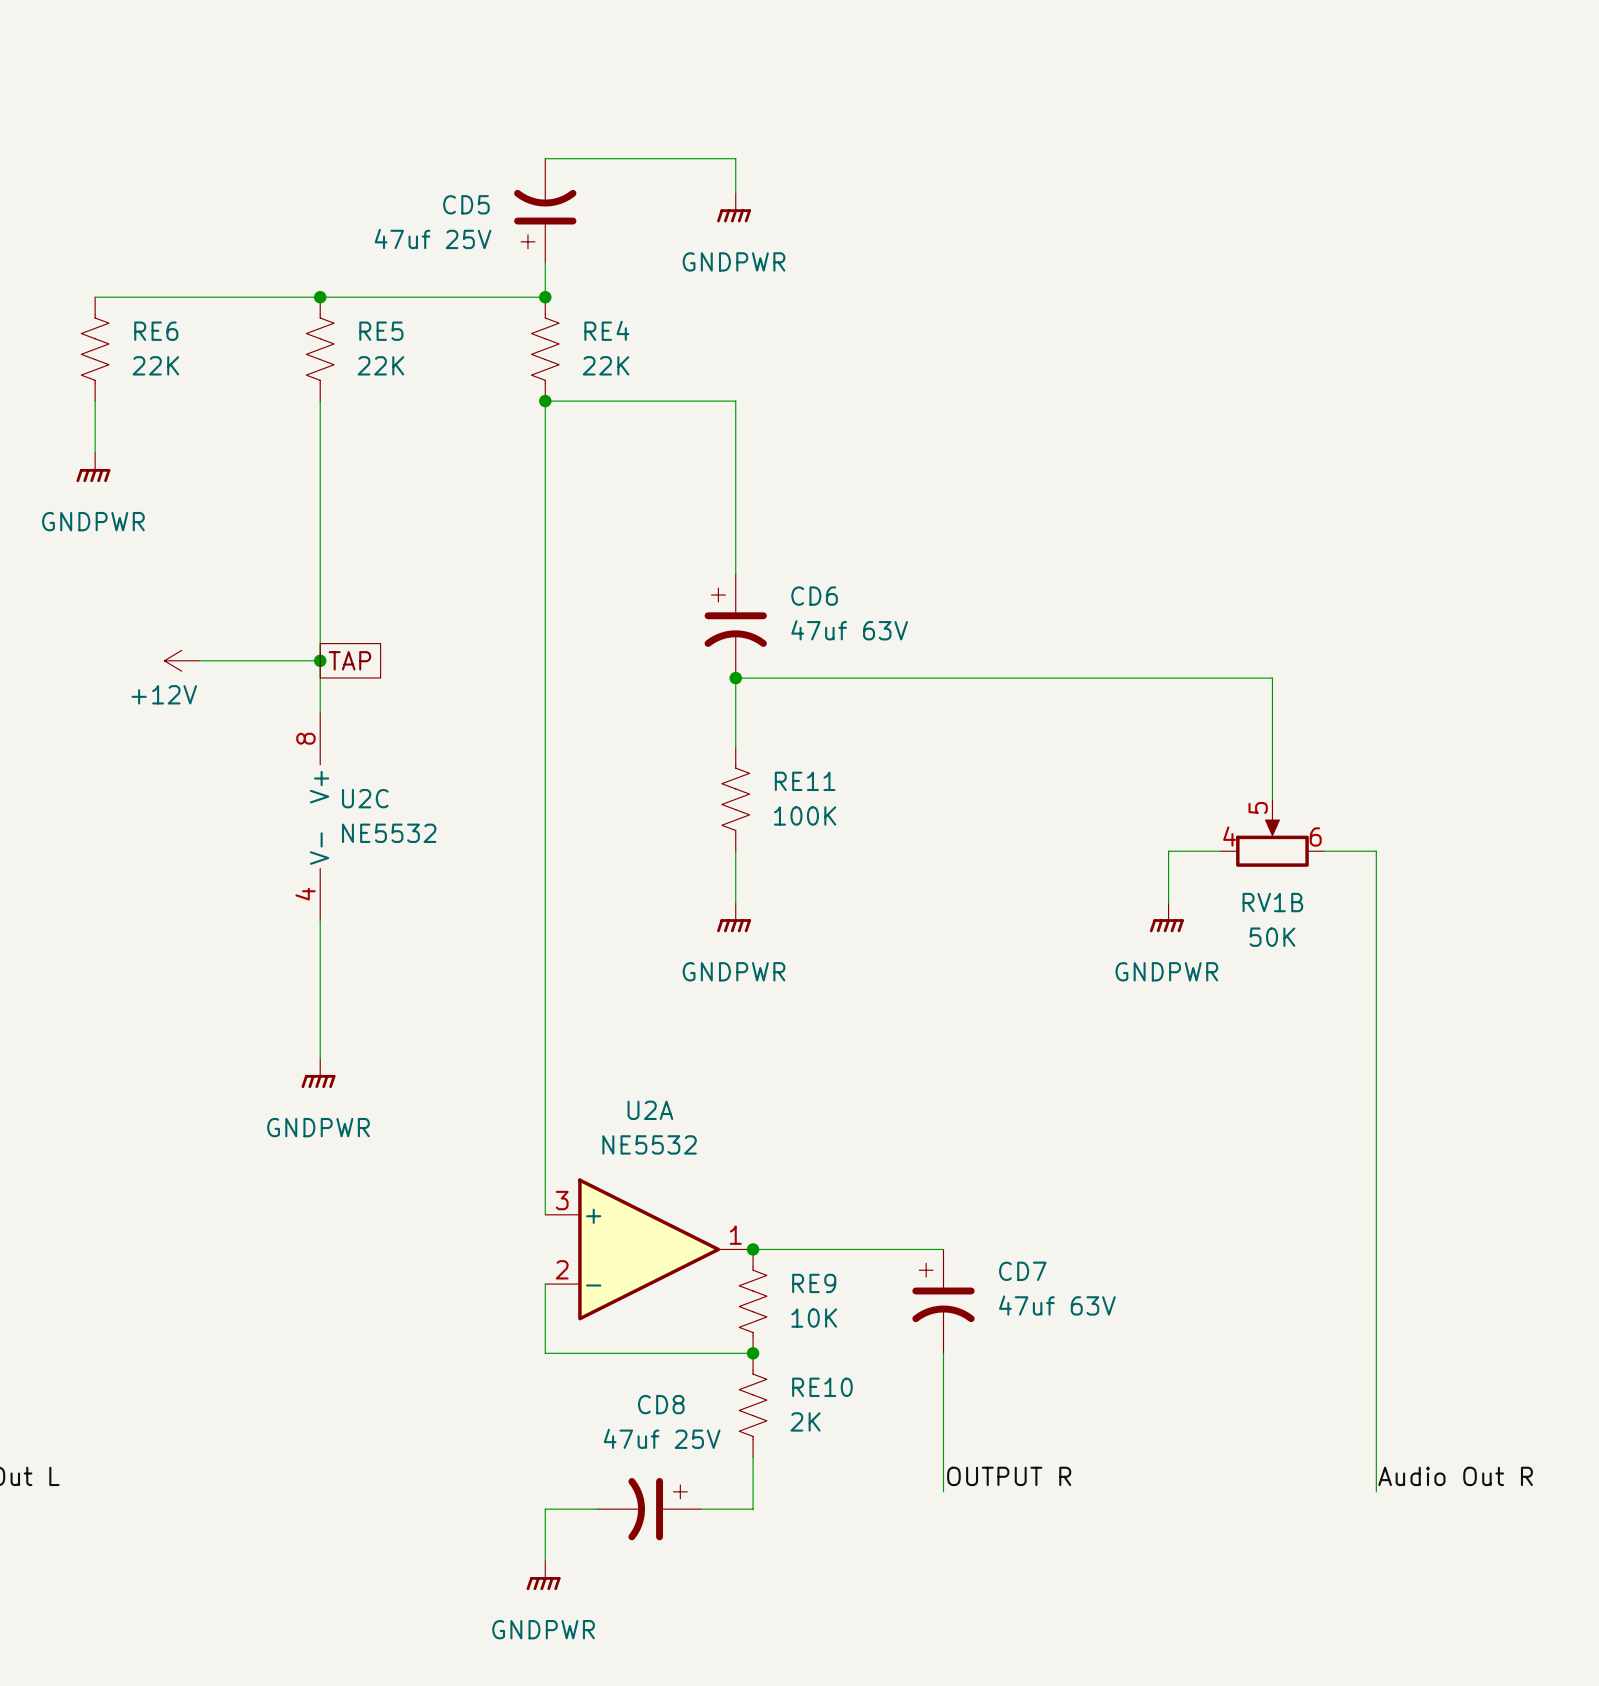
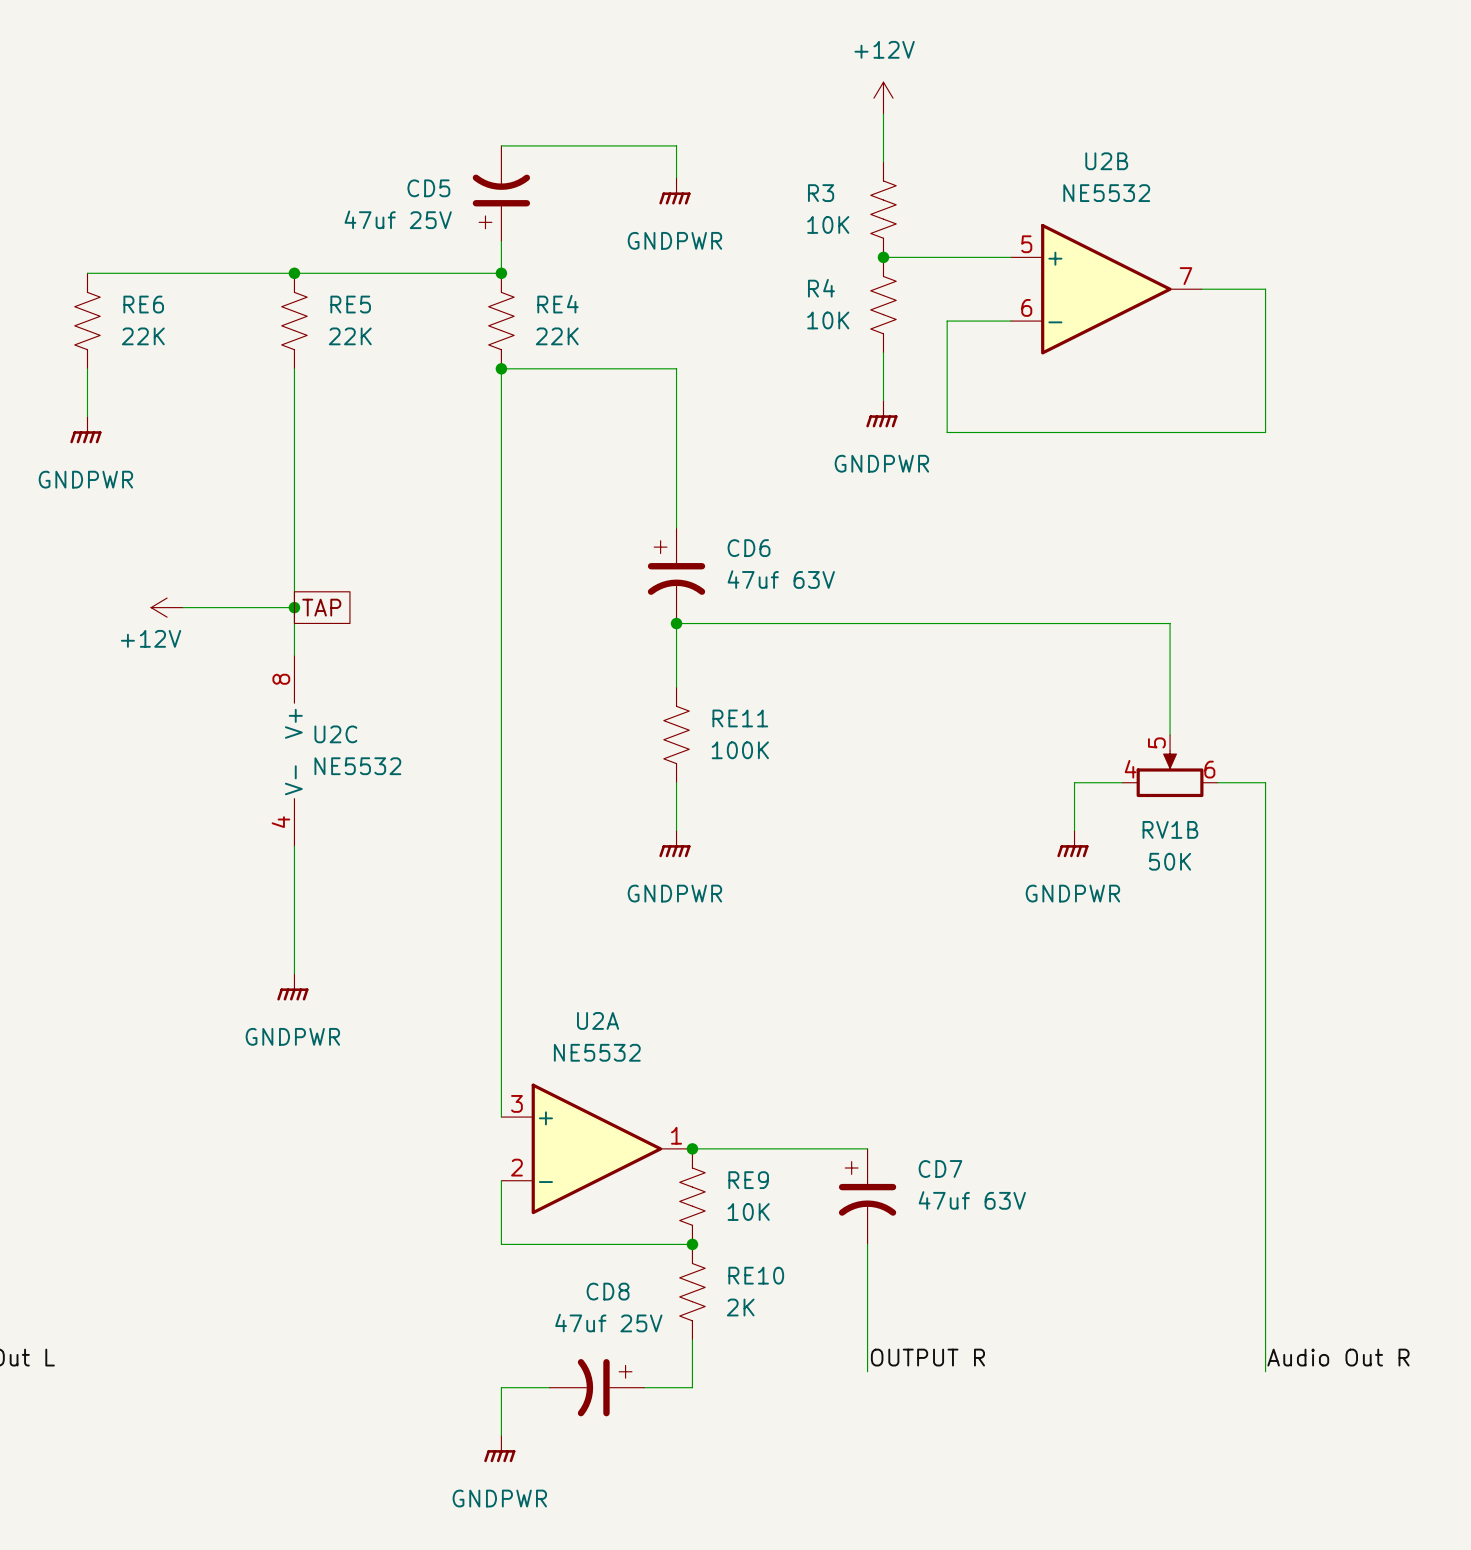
power symbol: none -> +12V (883, 98)
wire: none -> (883, 114) (883, 161)
R3: none -> 10K (883, 209)
wire: none -> (883, 257) (1010, 257)
junction: none -> (883, 257)
U2B: none -> NE5532 (1106, 289)
wire: none -> (1201, 289) (1265, 289) (1265, 432) (947, 432) (947, 321) (1010, 321)
R4: none -> 10K (883, 305)
wire: none -> (883, 352) (883, 400)
power symbol: none -> GNDPWR (881, 414)

